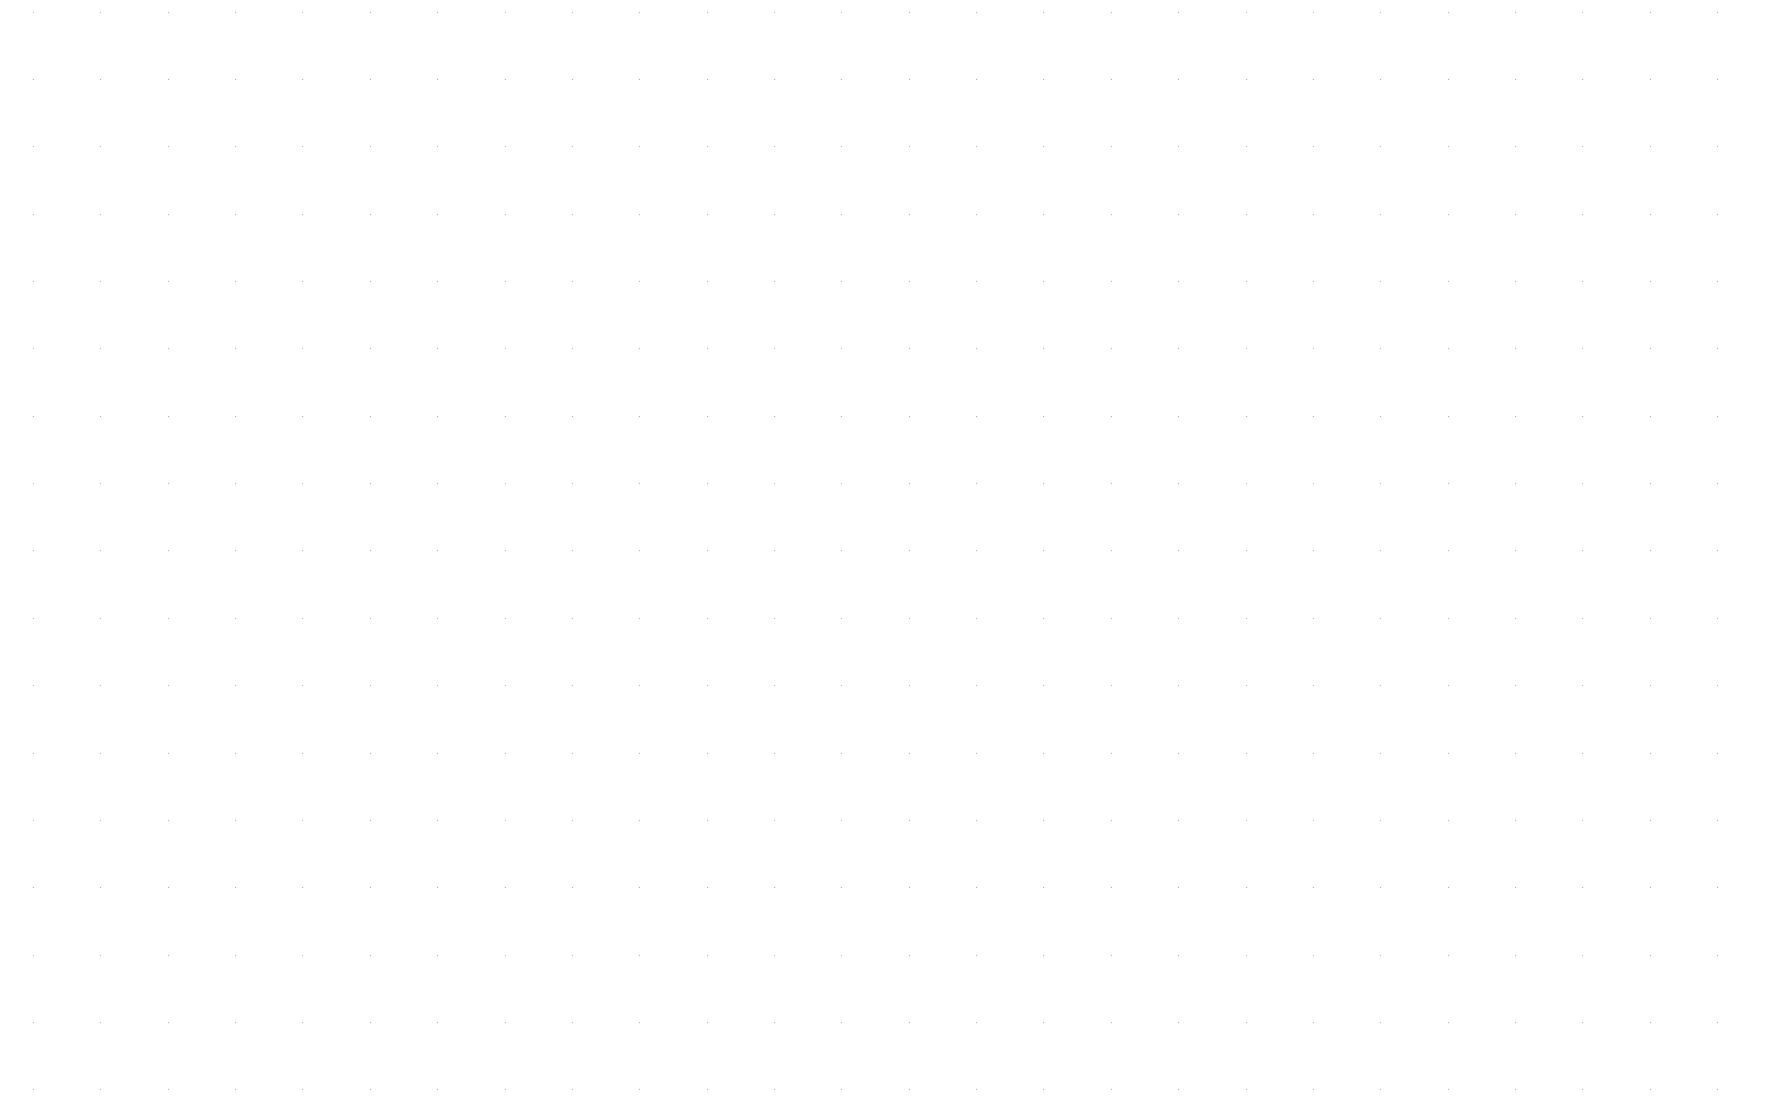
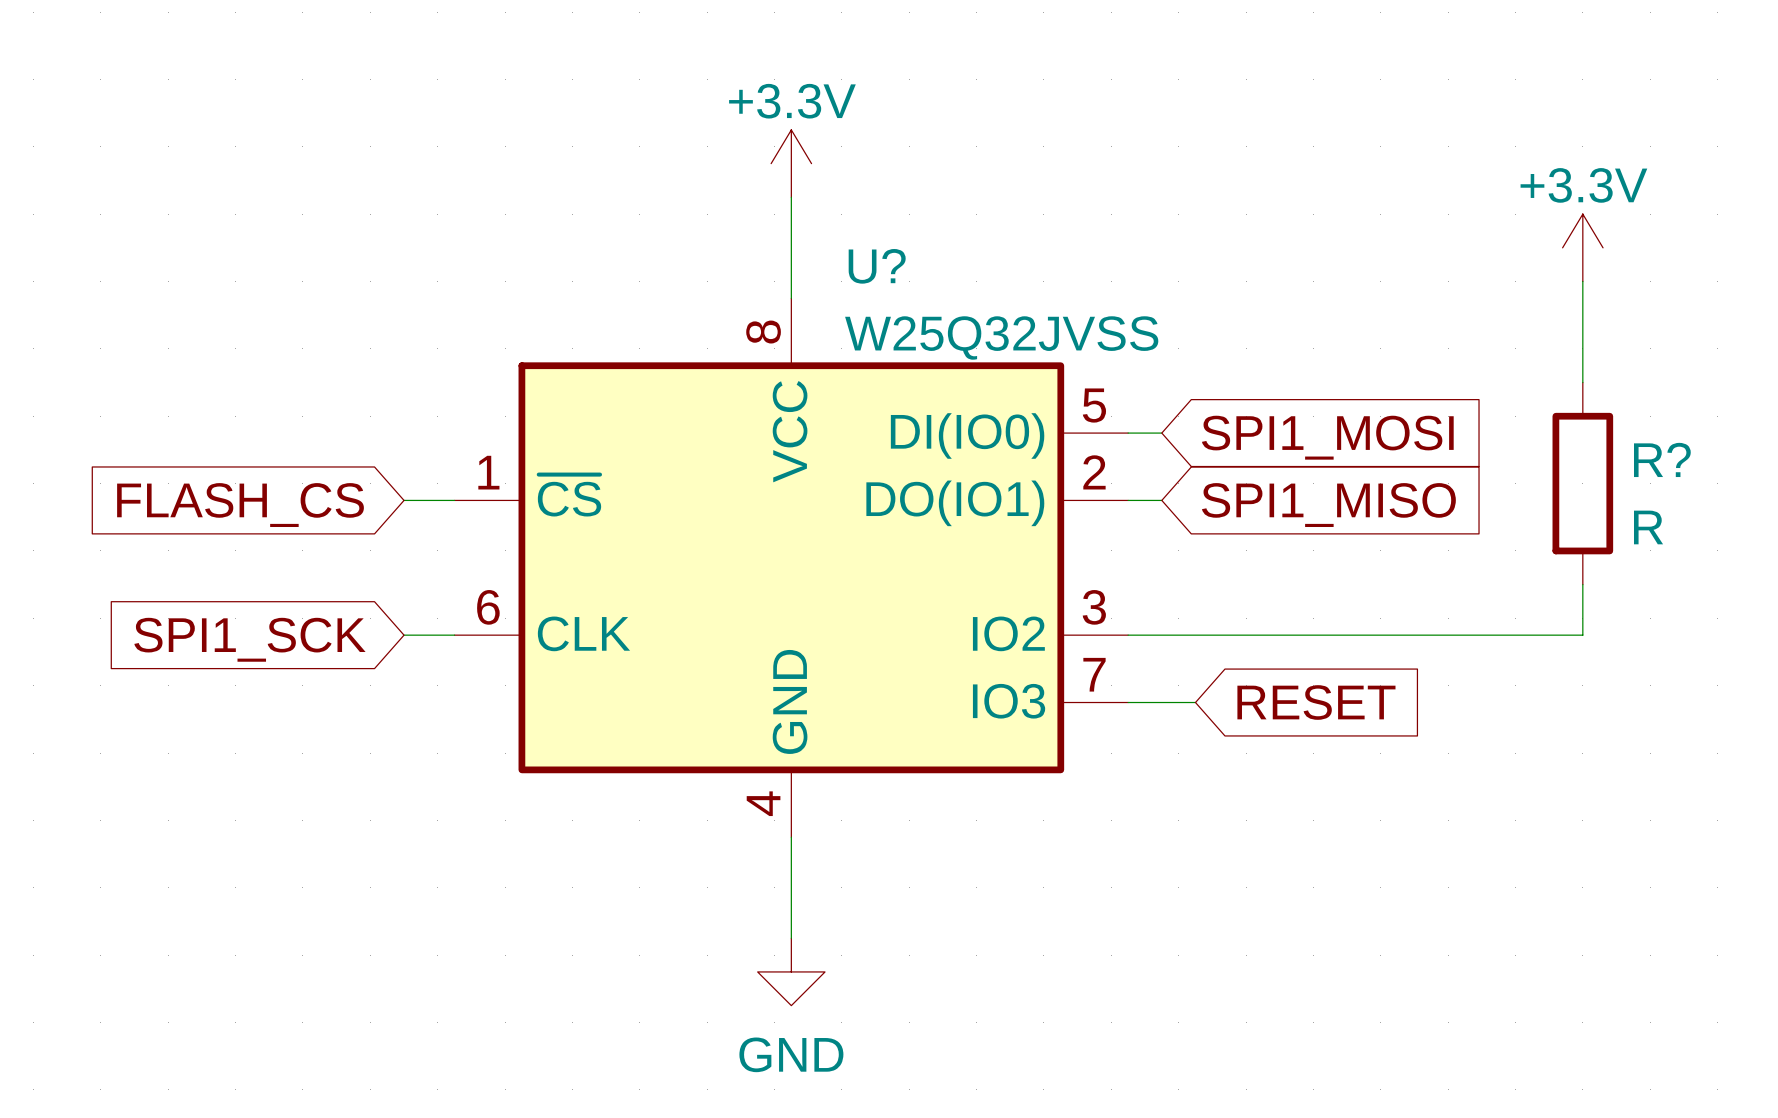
power symbol: none -> +3.3V (791, 163)
wire: none -> (791, 197) (791, 298)
power symbol: none -> +3.3V (1582, 247)
wire: none -> (1582, 281) (1582, 382)
wire: none -> (1128, 433) (1161, 433)
global label: none -> SPI1_MOSI (1327, 437)
R?: none -> R (1582, 483)
wire: none -> (404, 500) (454, 500)
wire: none -> (1128, 500) (1161, 500)
global label: none -> FLASH_CS (240, 505)
global label: none -> SPI1_MISO (1328, 505)
U?: none -> W25Q32JVSS (791, 567)
wire: none -> (1582, 584) (1582, 635) (1128, 635)
wire: none -> (404, 635) (454, 635)
global label: none -> SPI1_SCK (249, 639)
wire: none -> (1128, 702) (1195, 702)
global label: none -> RESET (1316, 702)
wire: none -> (791, 837) (791, 938)
power symbol: none -> GND (791, 971)

